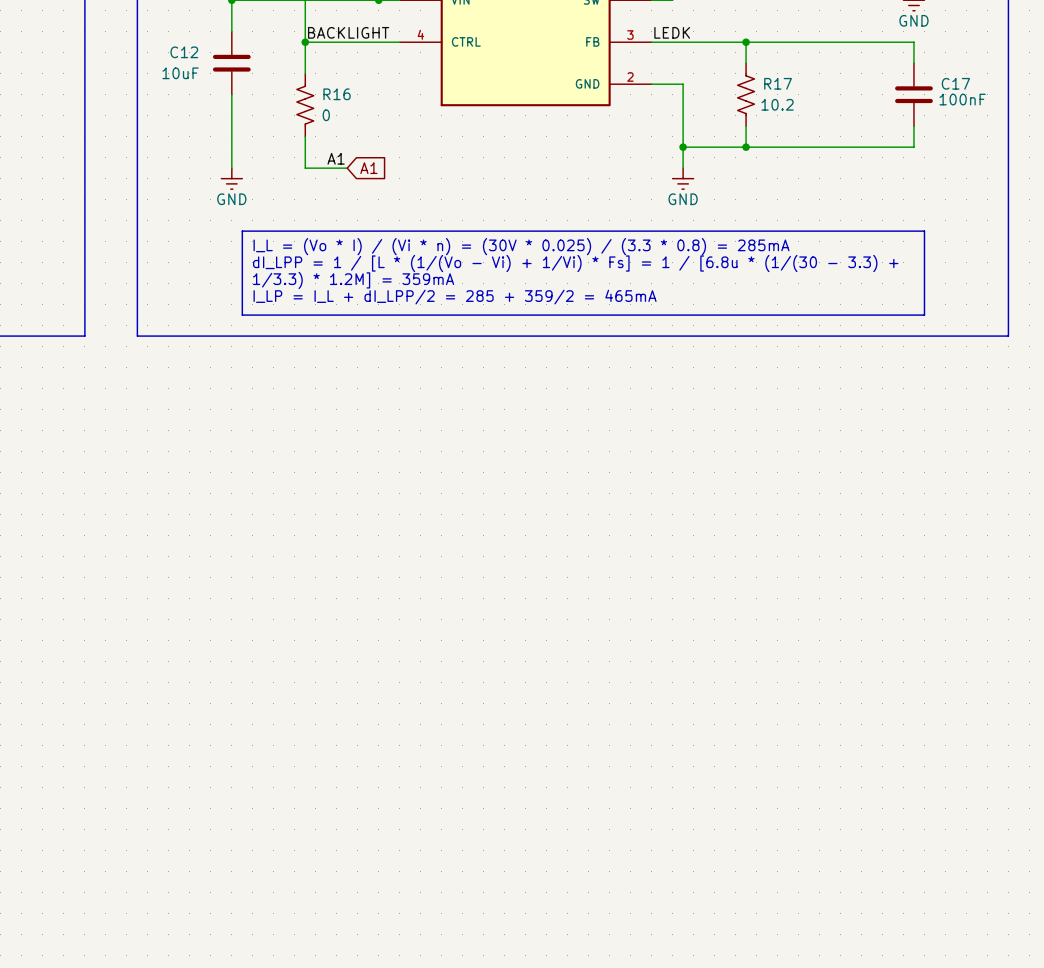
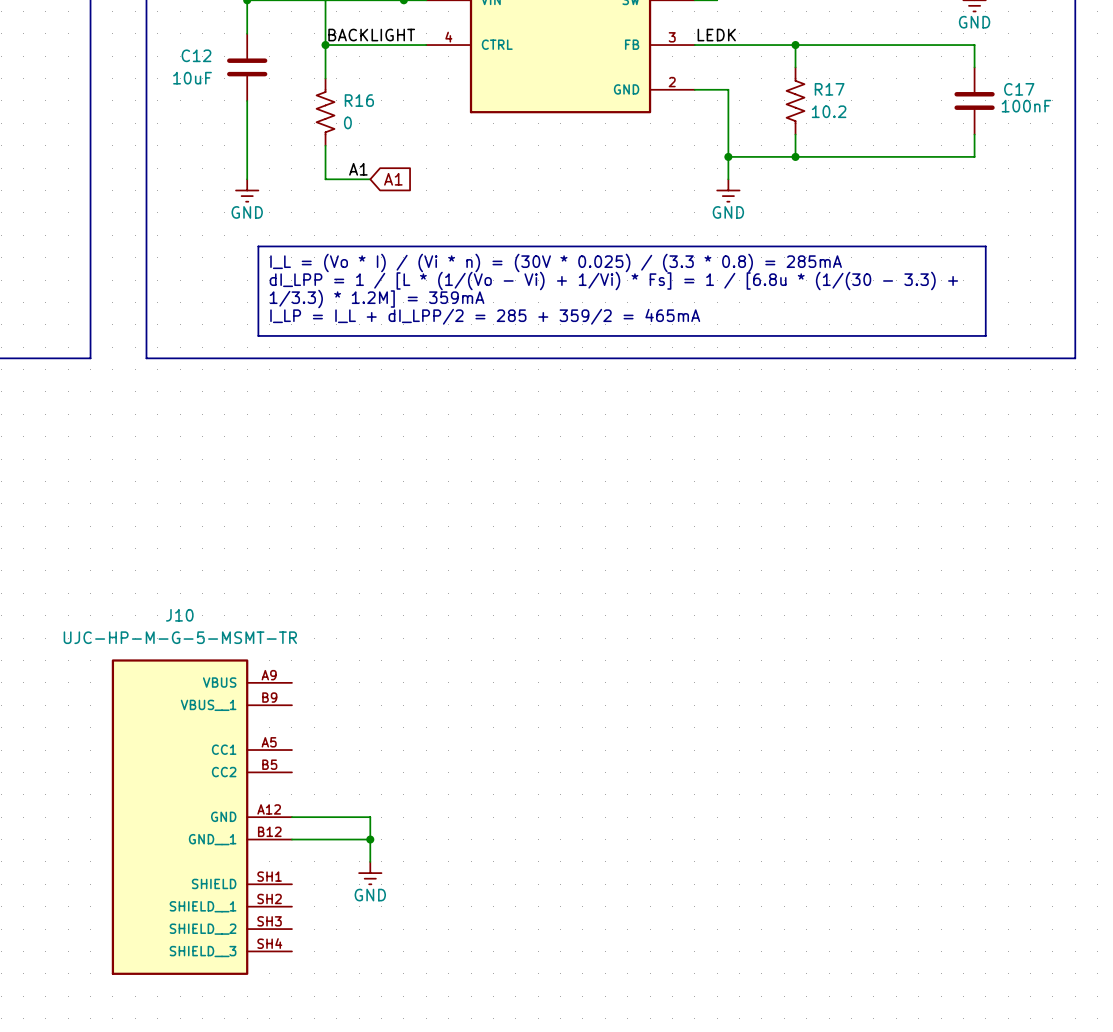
J10: none -> UJC-HP-M-G-5-MSMT-TR (201, 817)
wire: none -> (291, 817) (370, 817) (370, 861)
wire: none -> (291, 839) (370, 839)
junction: none -> (370, 839)
power symbol: none -> GND (370, 873)

